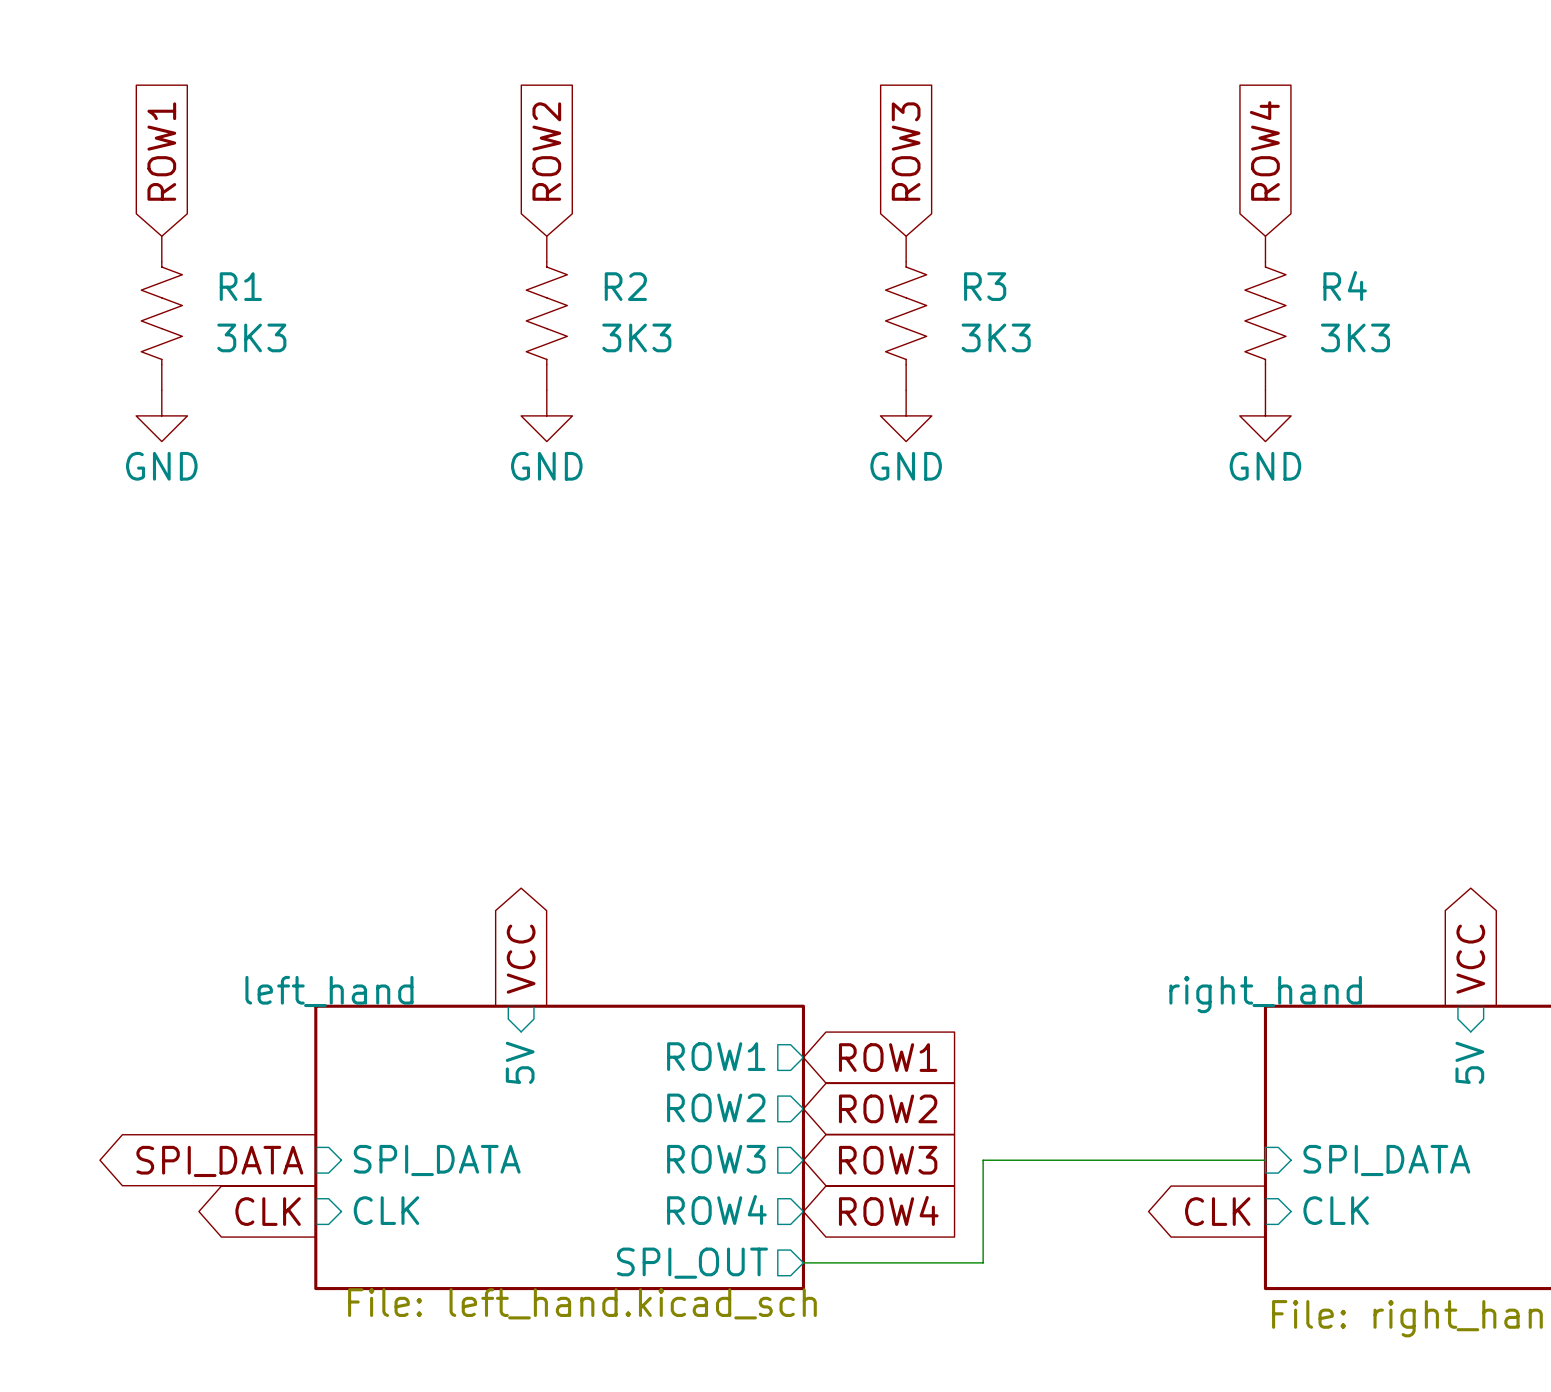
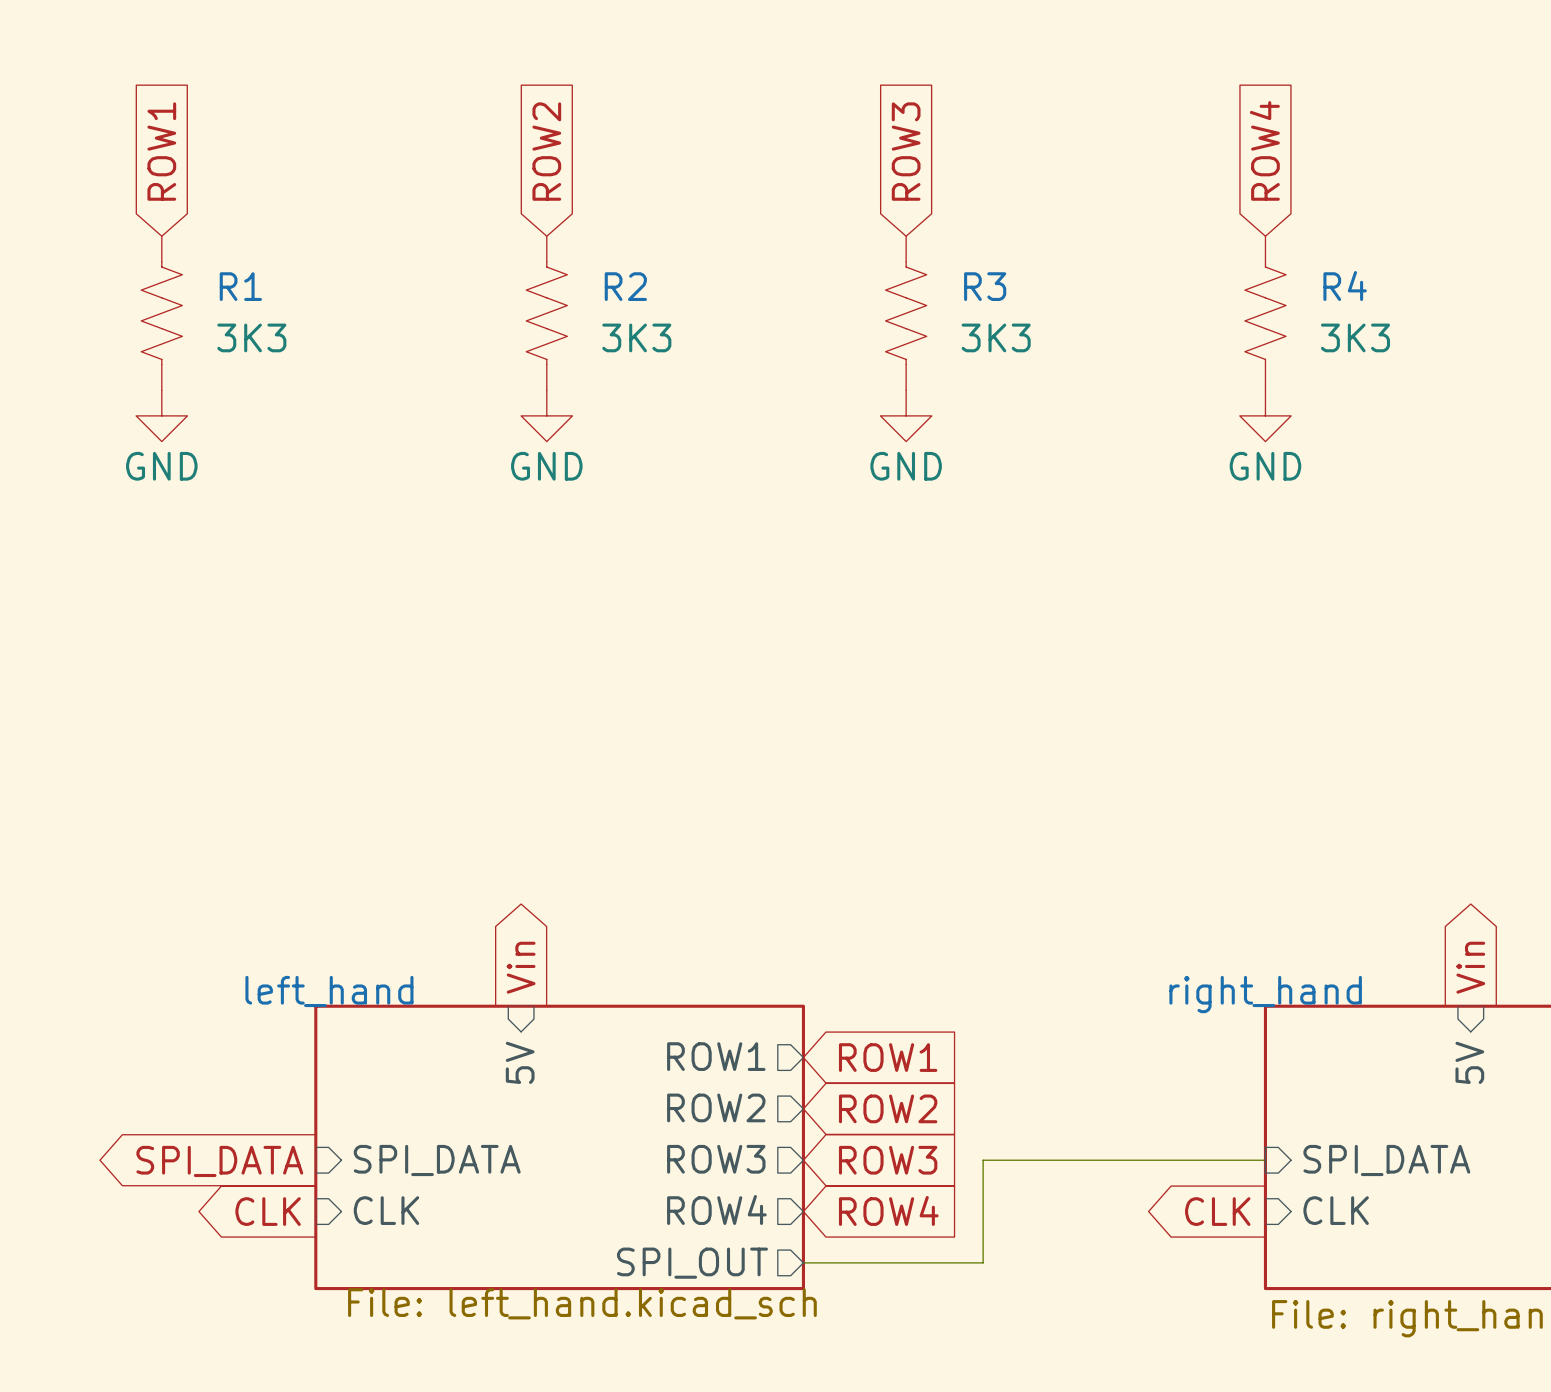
global label: VCC (521, 959) -> Vin (521, 967)
global label: VCC (1470, 959) -> Vin (1470, 967)

